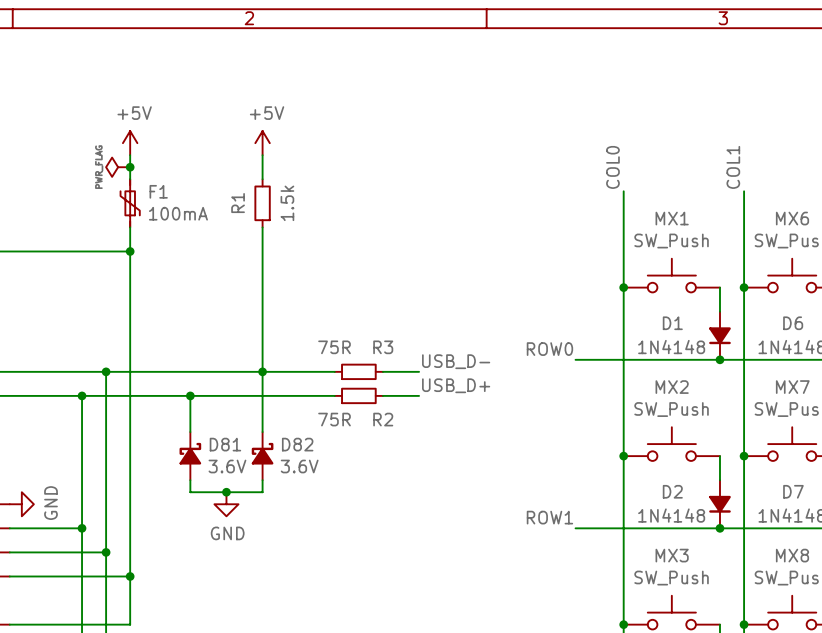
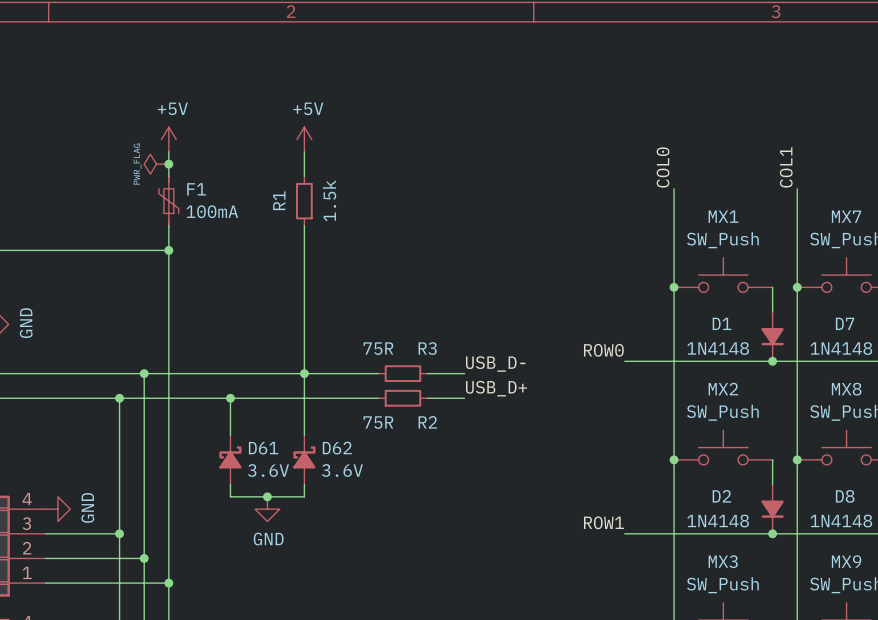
MX6 name: MX6 (792, 218) -> MX7 (846, 216)
D6 name: D6 (793, 323) -> D7 (845, 323)
MX7 name: MX7 (792, 387) -> MX8 (846, 389)
D81 name: D81 (225, 444) -> D61 (263, 448)
D82 name: D82 (297, 444) -> D62 (337, 448)
D7 name: D7 (793, 491) -> D8 (845, 496)
MX8 name: MX8 (792, 555) -> MX9 (846, 561)

